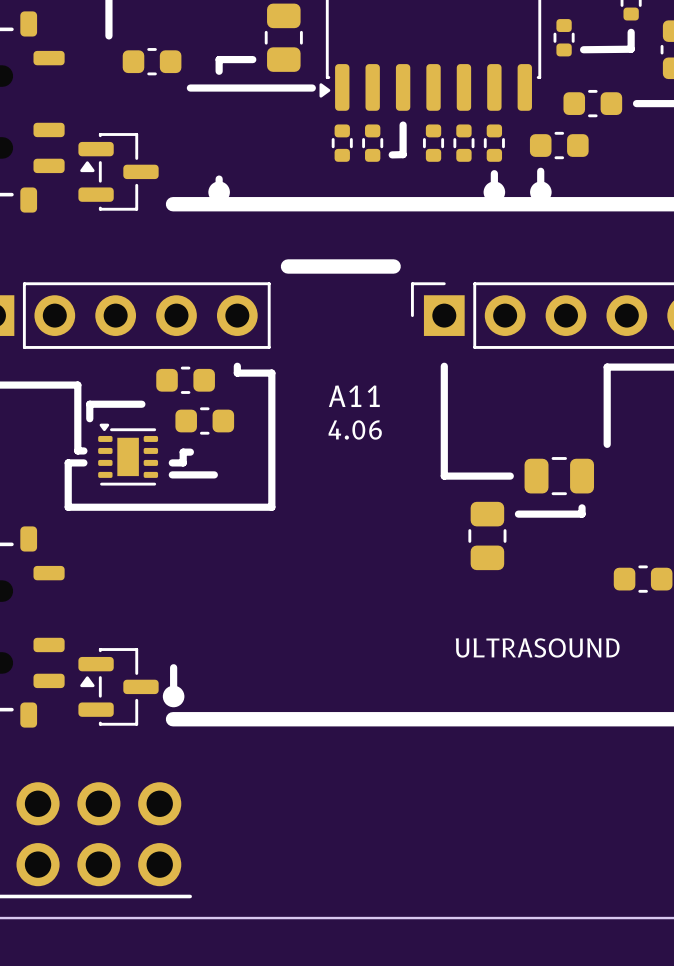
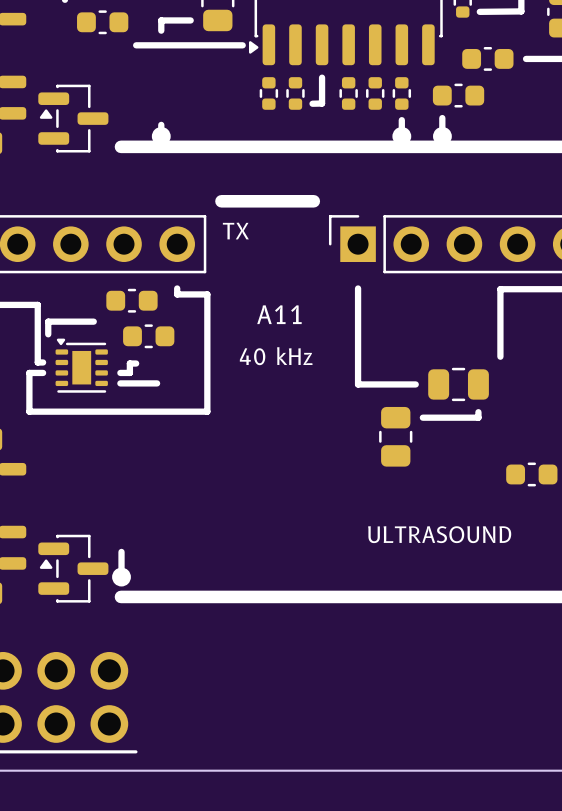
text: none -> TX (235, 231)
text: 4.06 (355, 429) -> none
text: none -> 40 kHz (276, 356)

